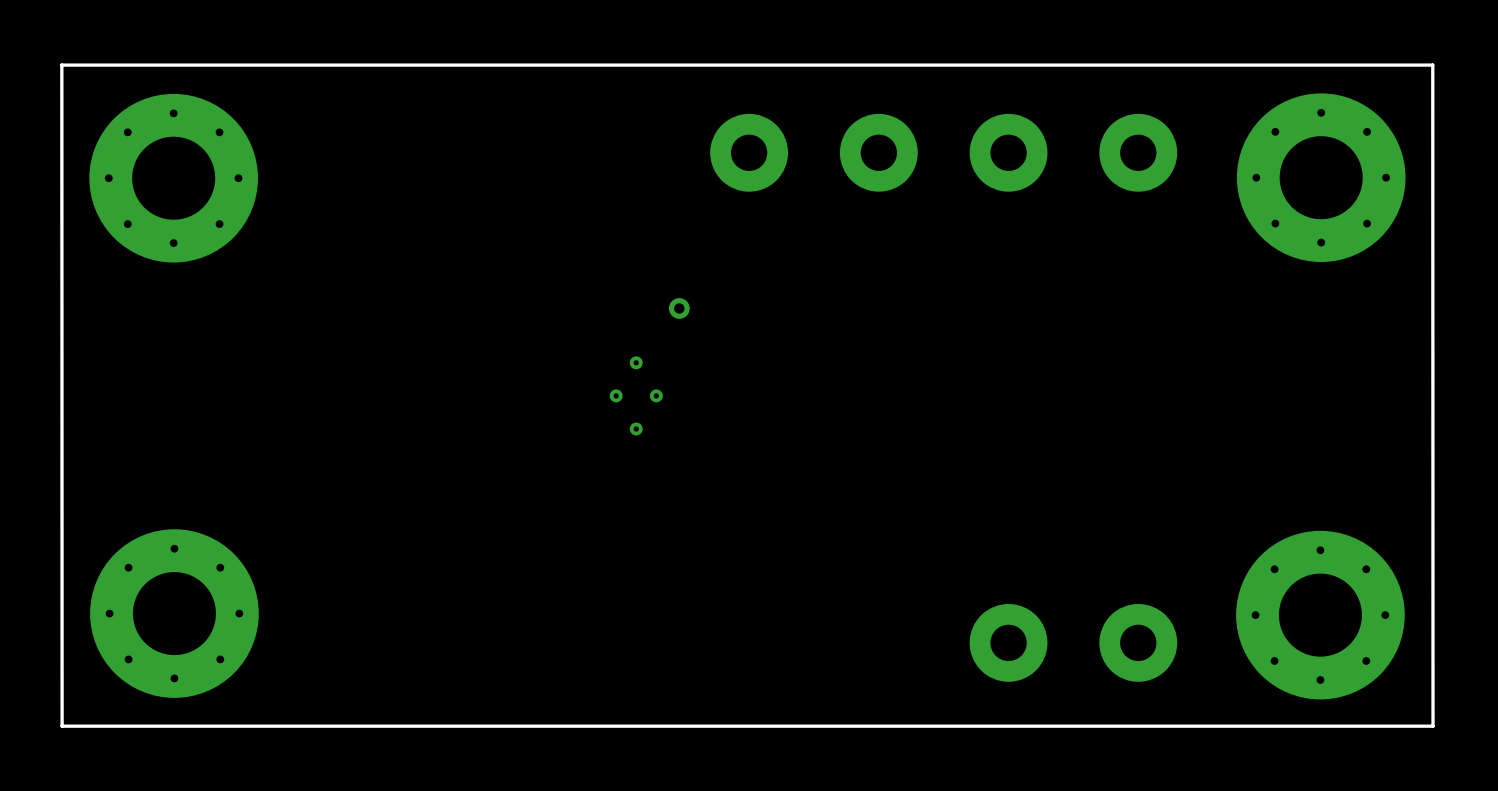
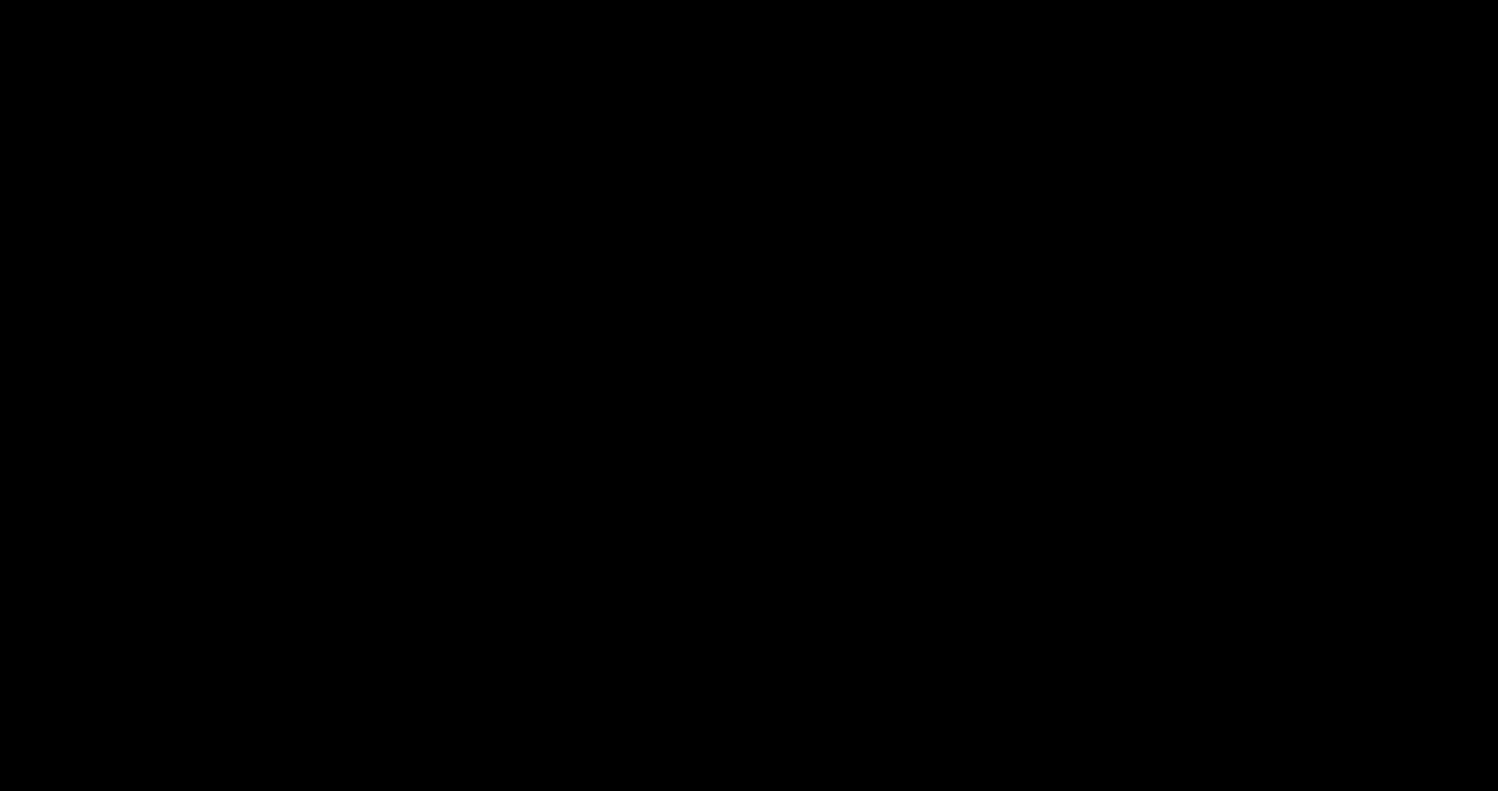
board edge: (1432, 65) (1433, 726) (62, 726) (61, 65) (1432, 65) -> none
part: (813, 152) -> none
part: (1073, 152) -> none
part: (1321, 177) -> none
part: (173, 178) -> none
via: (679, 308) -> none
part: (636, 395) -> none
part: (174, 613) -> none
part: (1320, 615) -> none
part: (1073, 642) -> none

